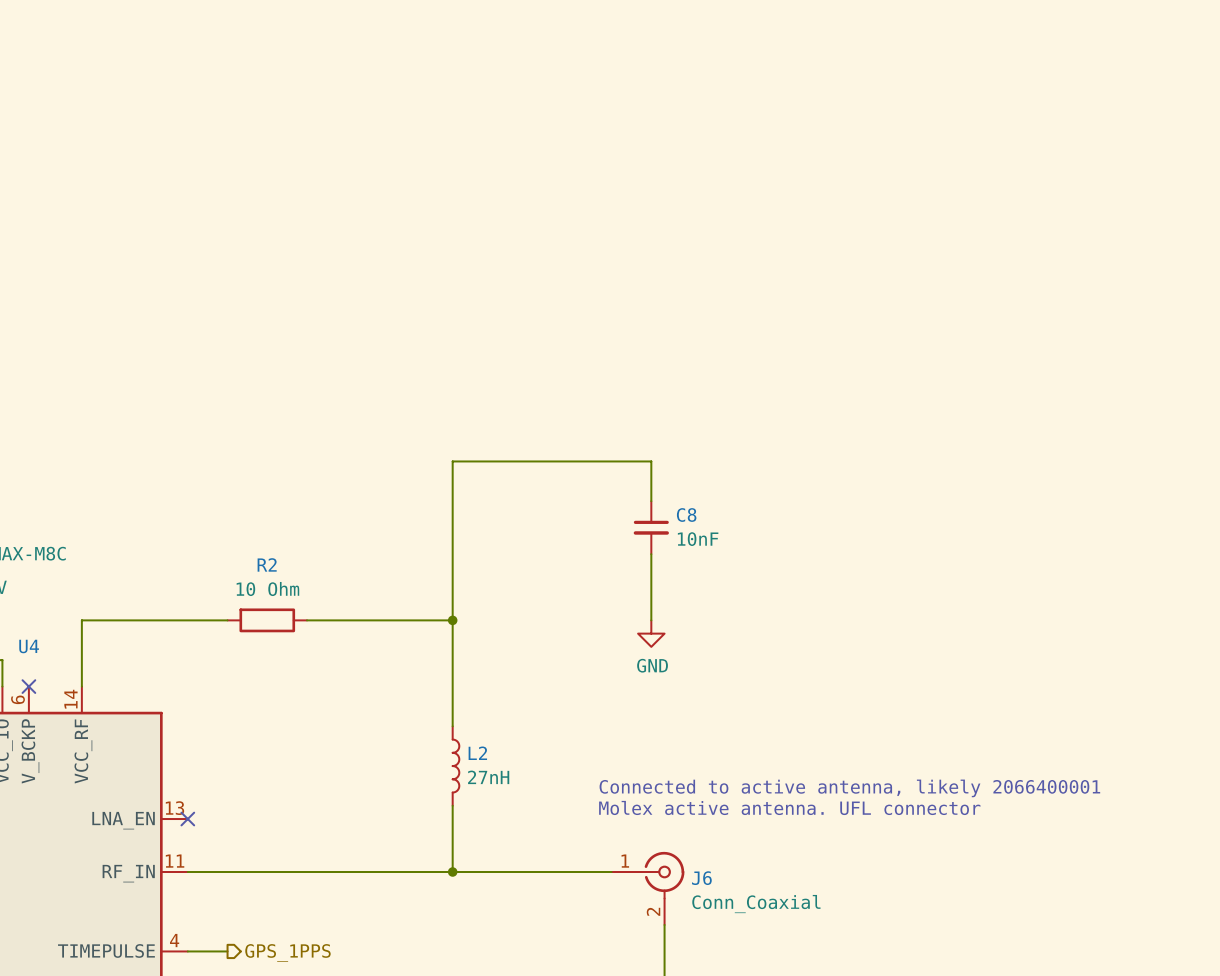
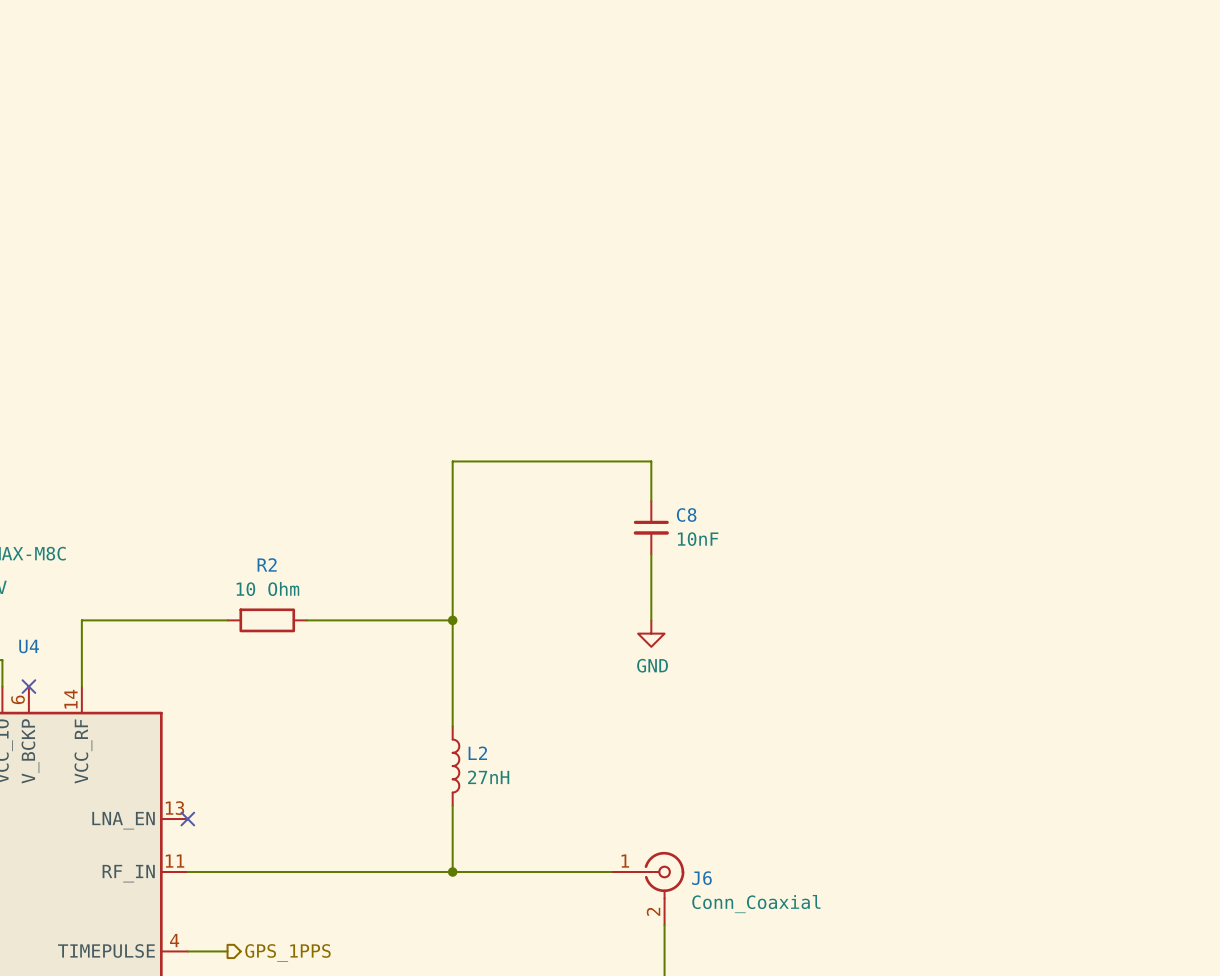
text: Connected to active antenna, likely 2066400001 (849, 788) -> none
text: Molex active antenna. UFL connector (789, 807) -> none

